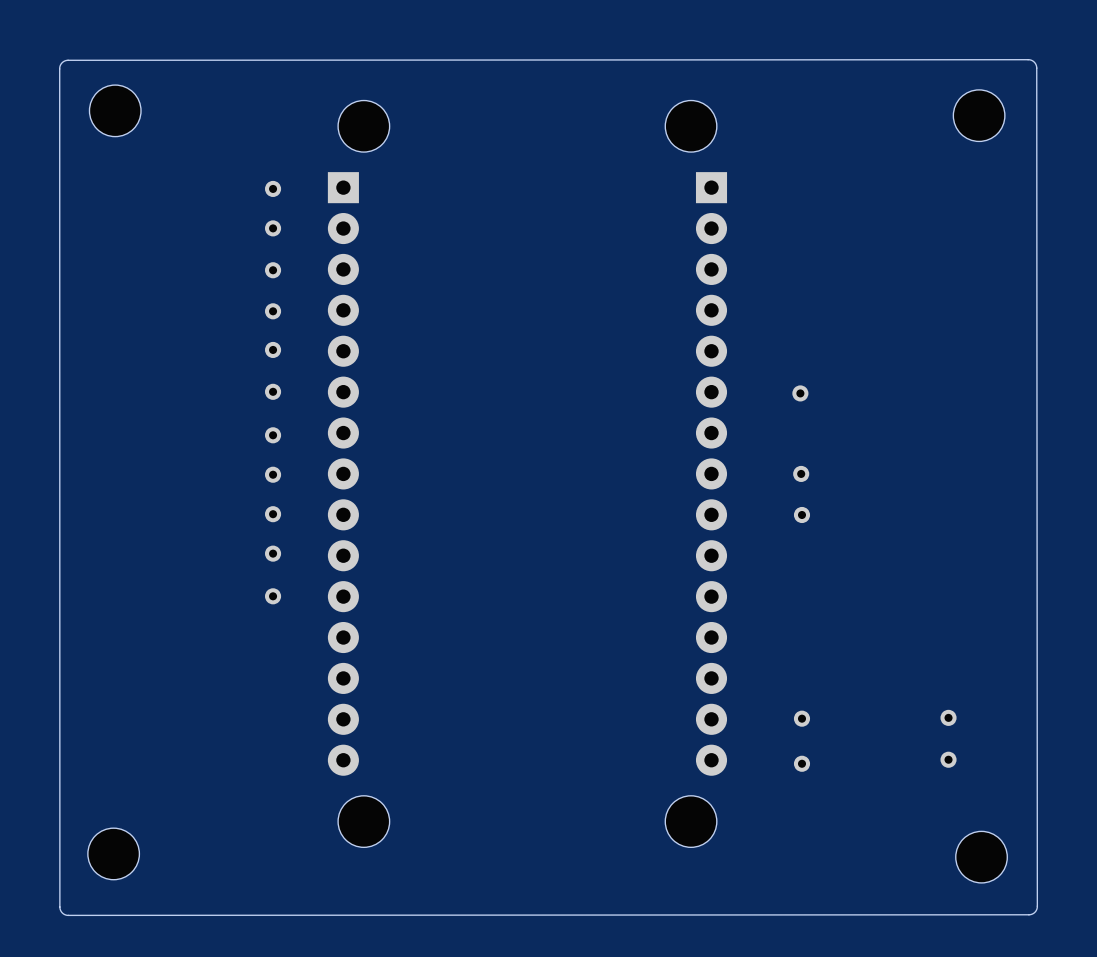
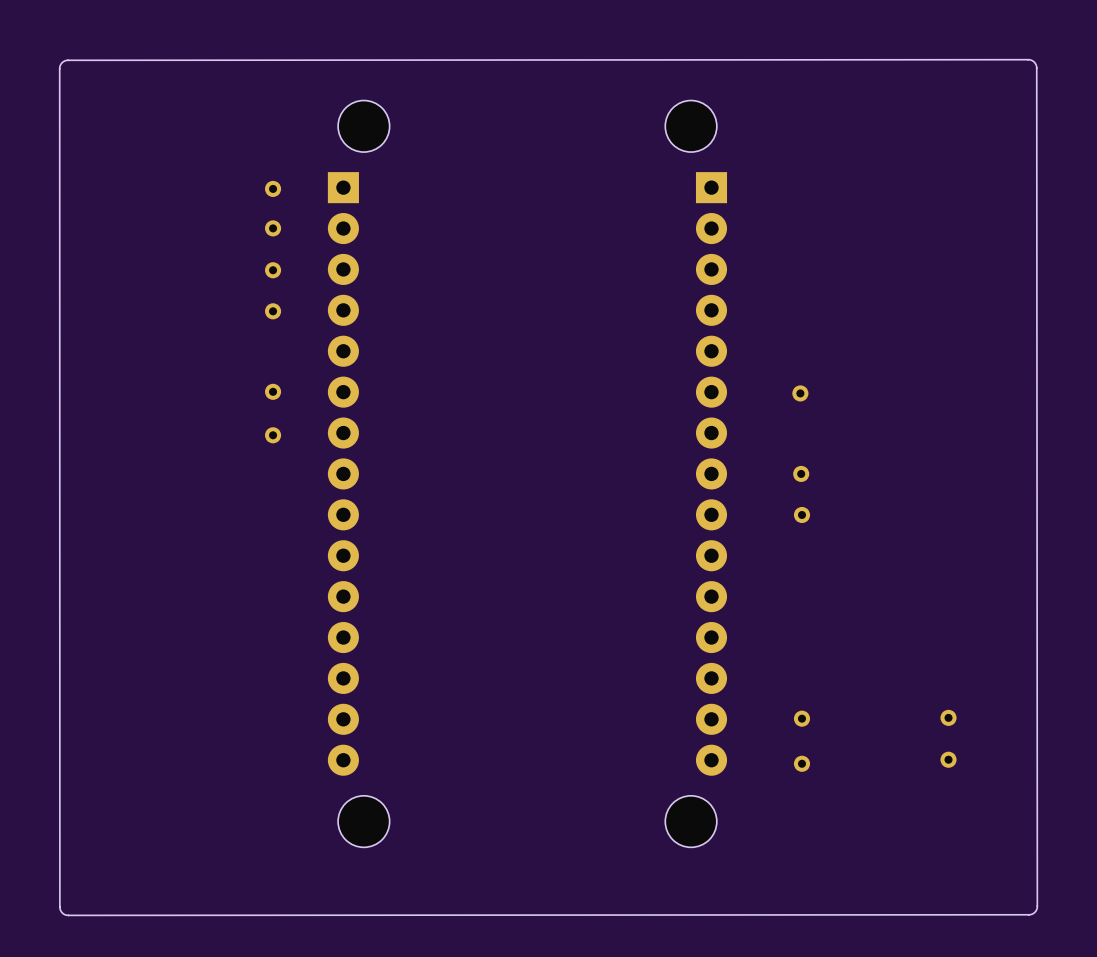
part: (115, 110) -> none
part: (979, 115) -> none
part: (273, 349) -> none
part: (273, 474) -> none
part: (273, 514) -> none
part: (273, 553) -> none
part: (273, 596) -> none
part: (113, 853) -> none
part: (981, 857) -> none

